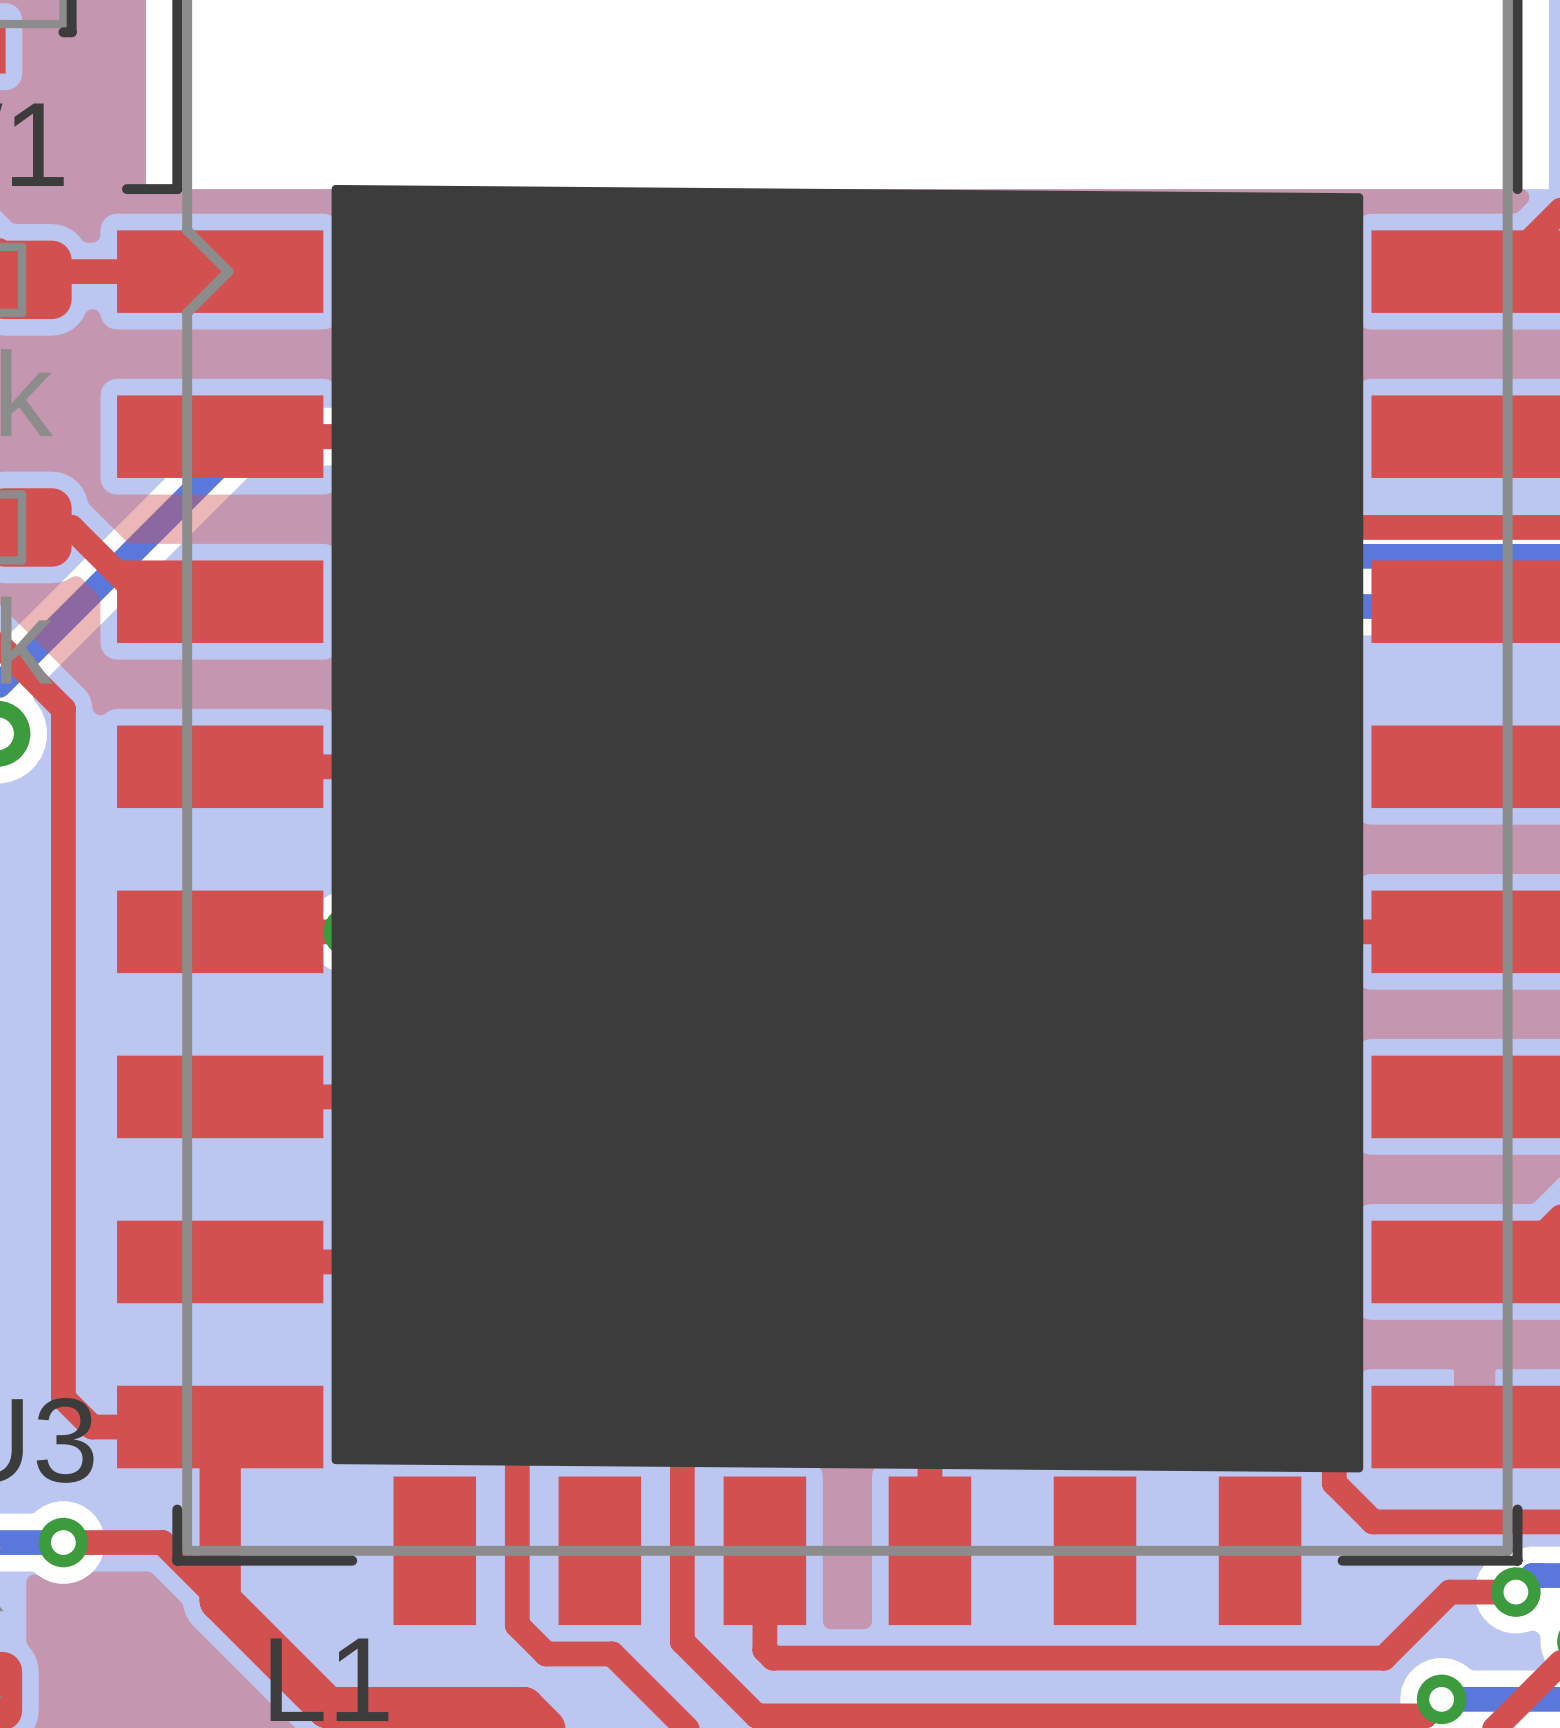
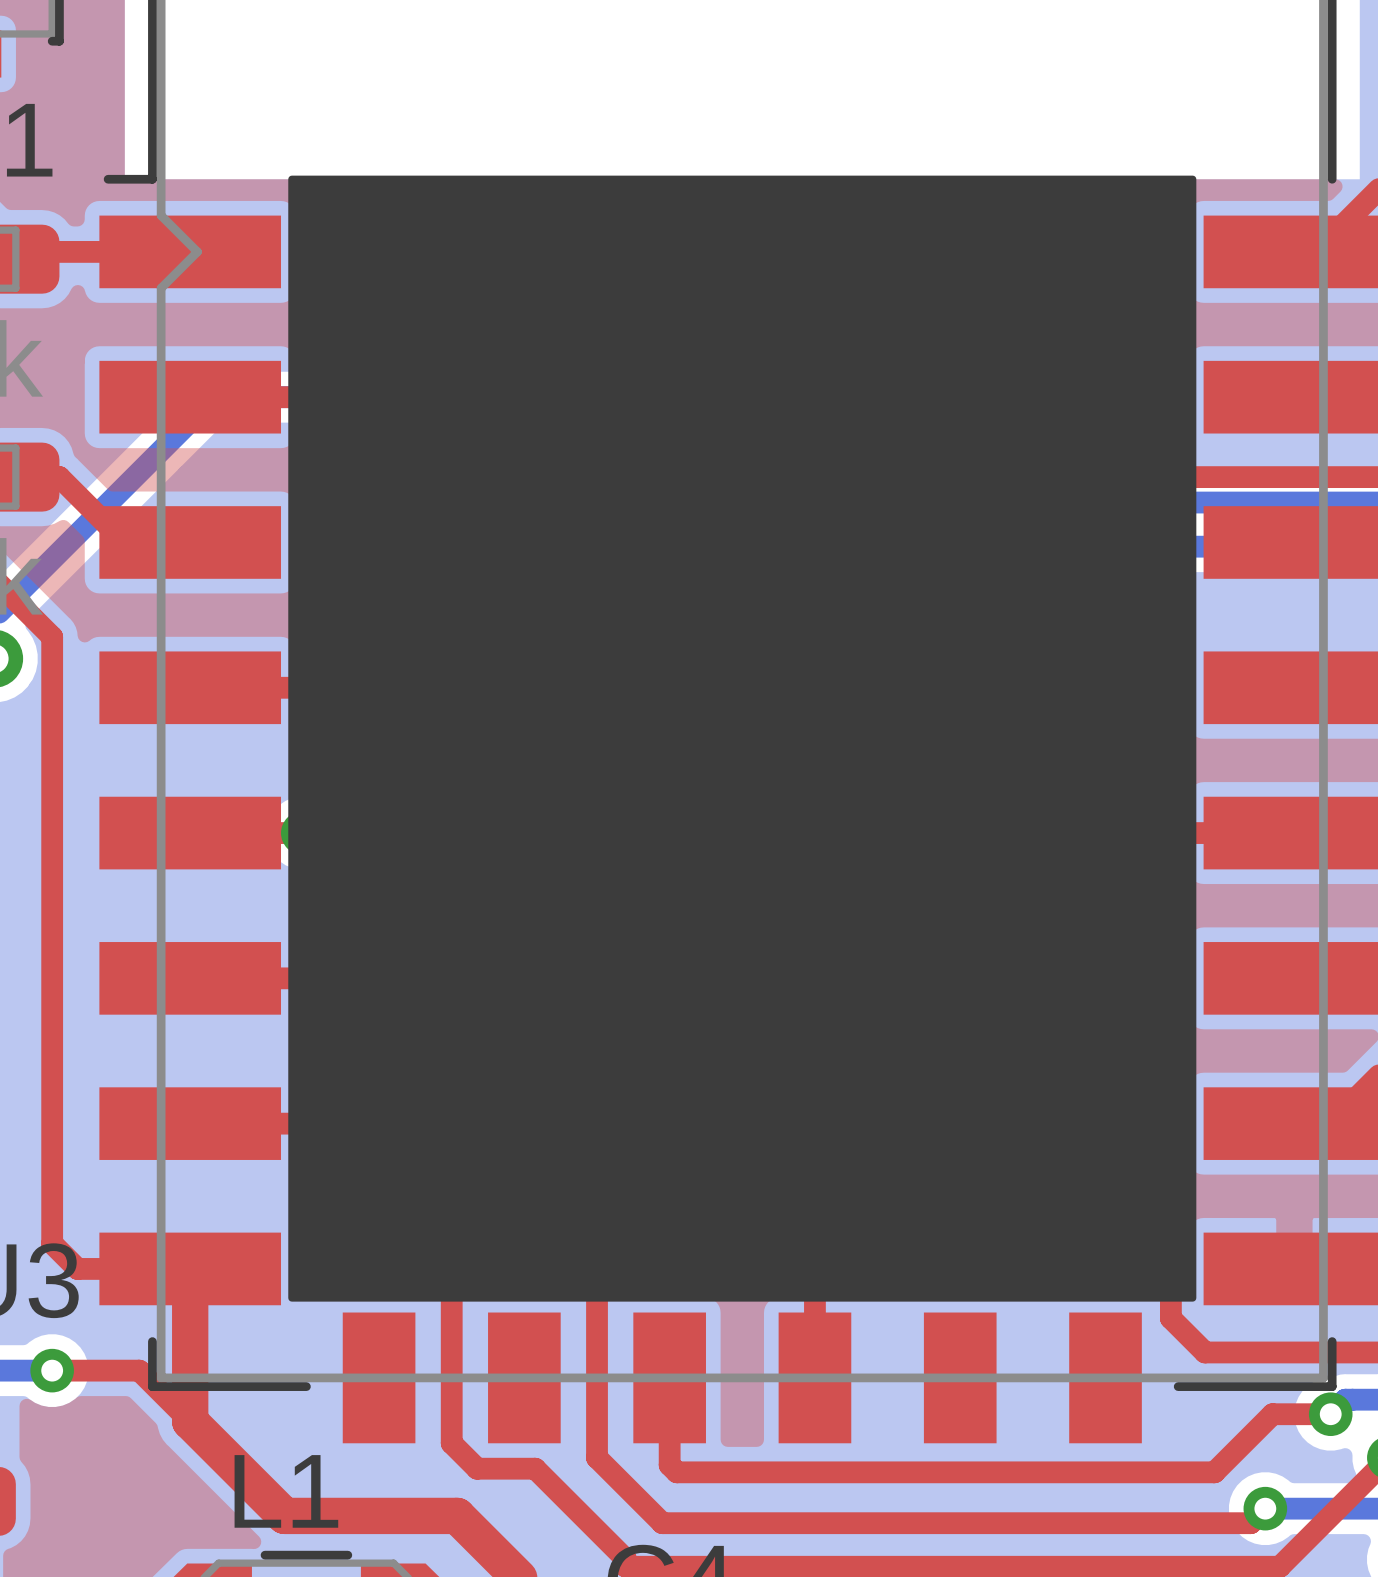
drawing shape: [331, 184, 1364, 1473] -> [288, 175, 1197, 1302]

